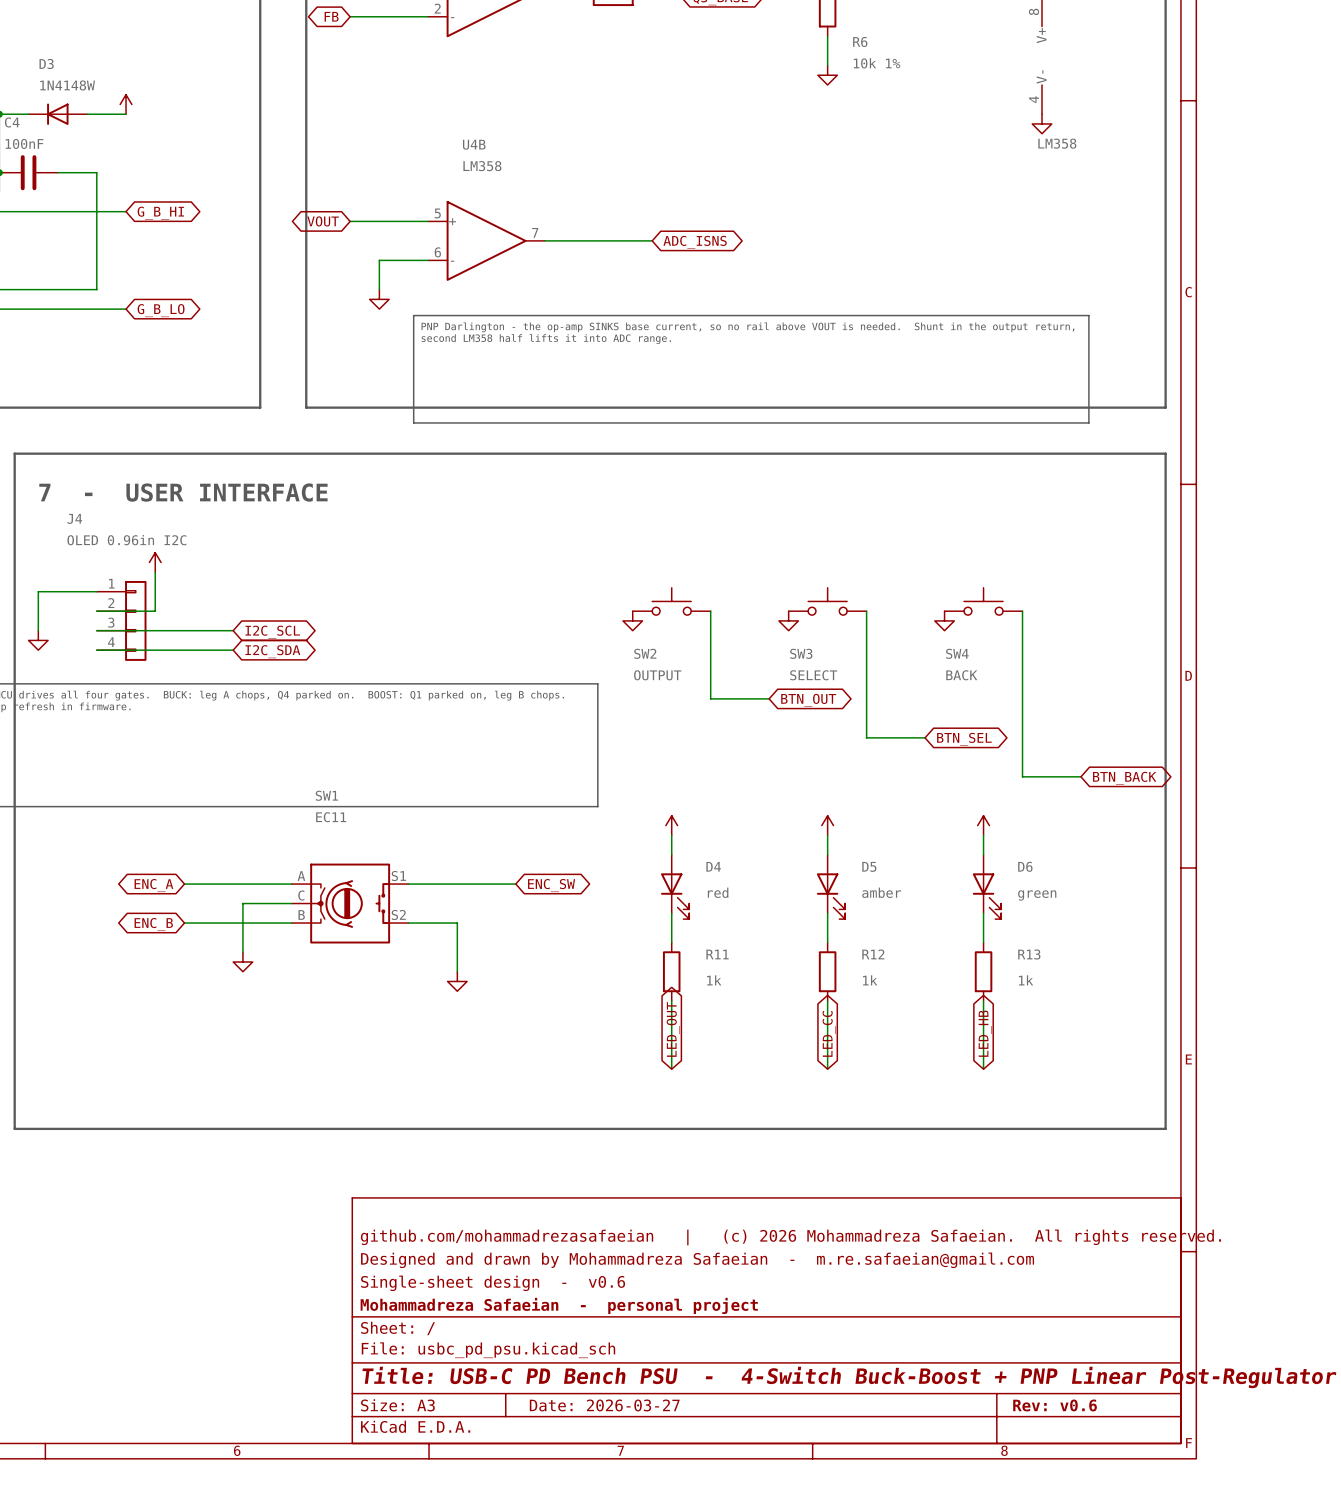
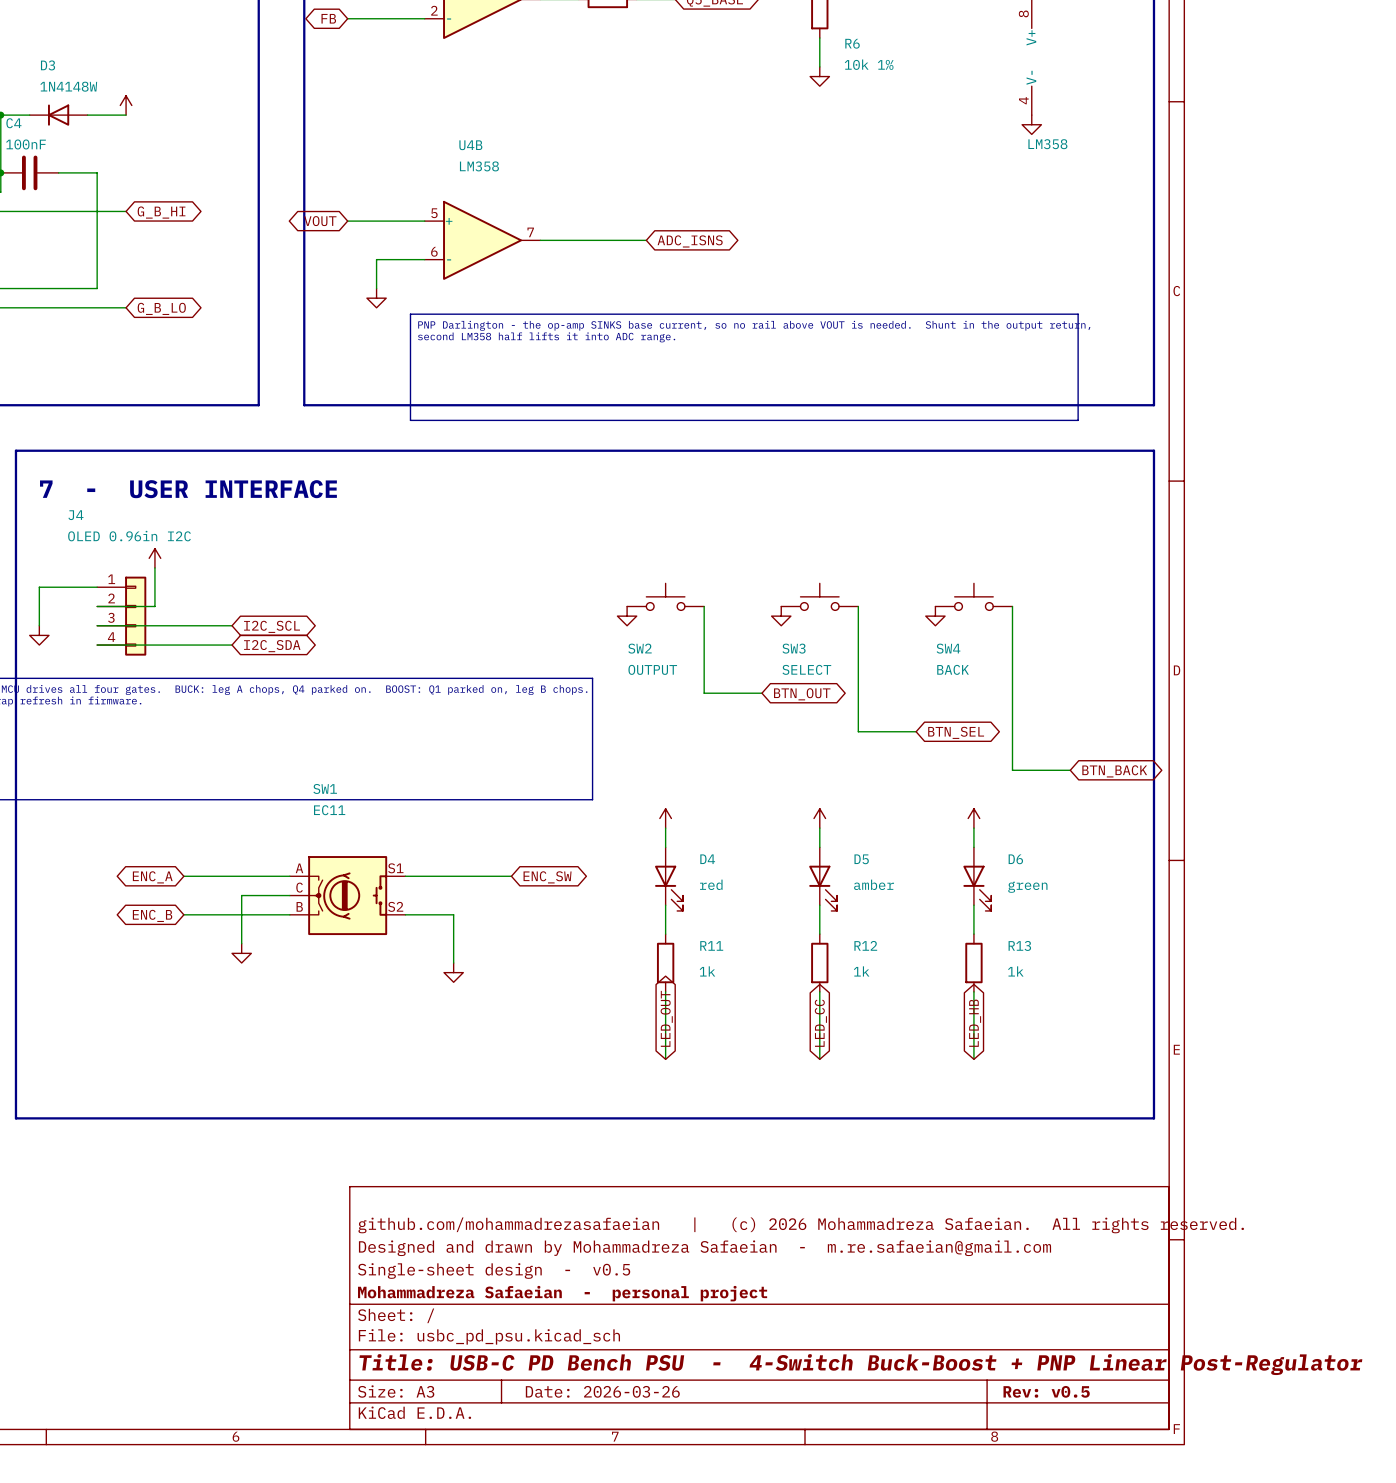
title block: Single-sheet design - v0.6 (493, 1283) -> Single-sheet design - v0.5 (494, 1271)
title block: Date: 2026-03-27 (604, 1405) -> Date: 2026-03-26 (602, 1391)
title block: Rev: v0.6 (1055, 1405) -> Rev: v0.5 (1046, 1391)

